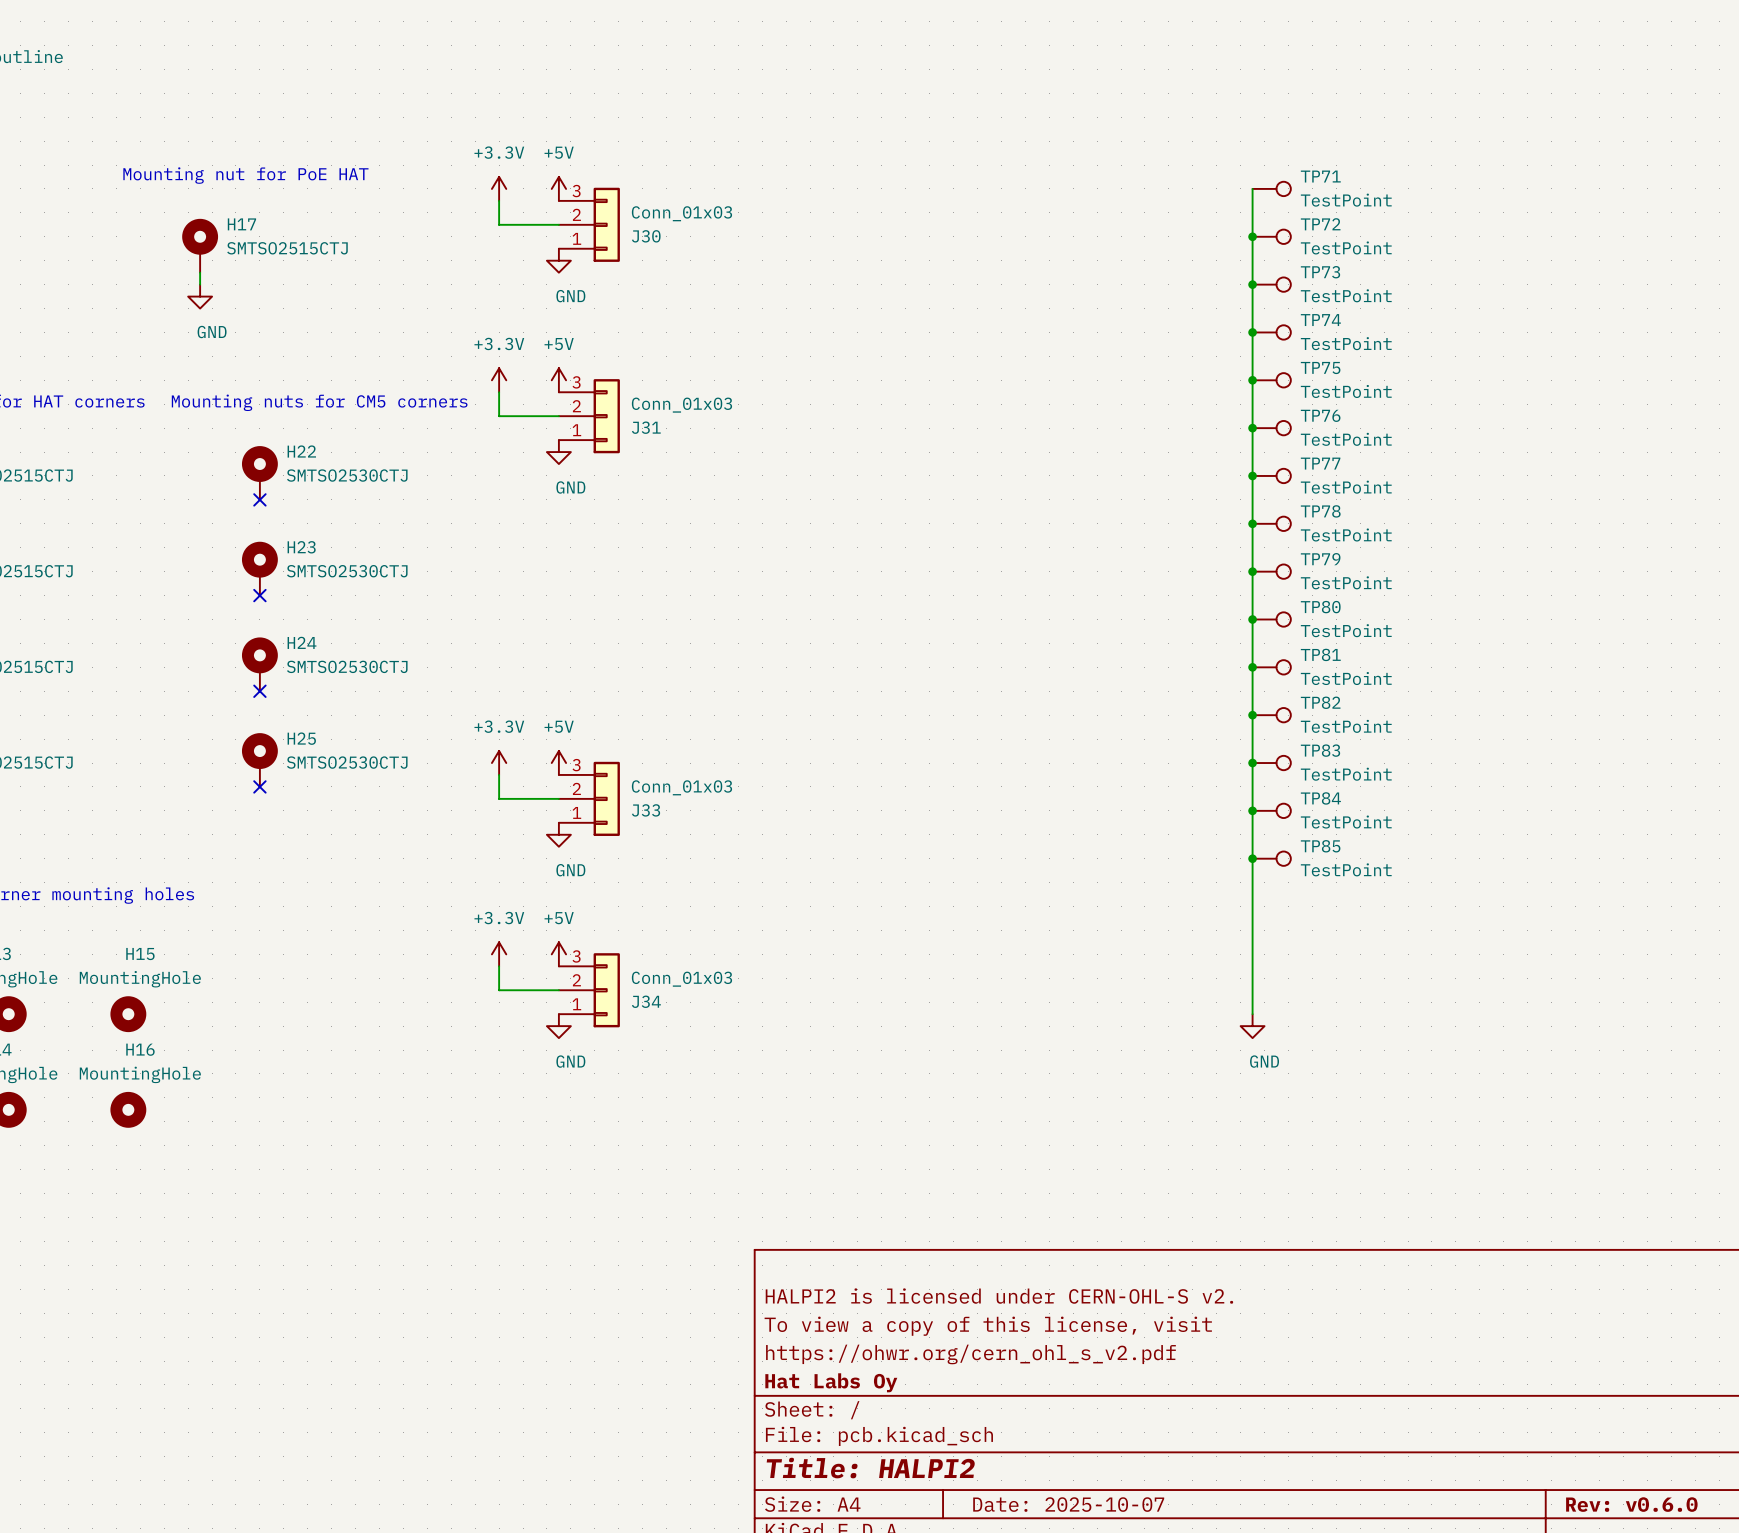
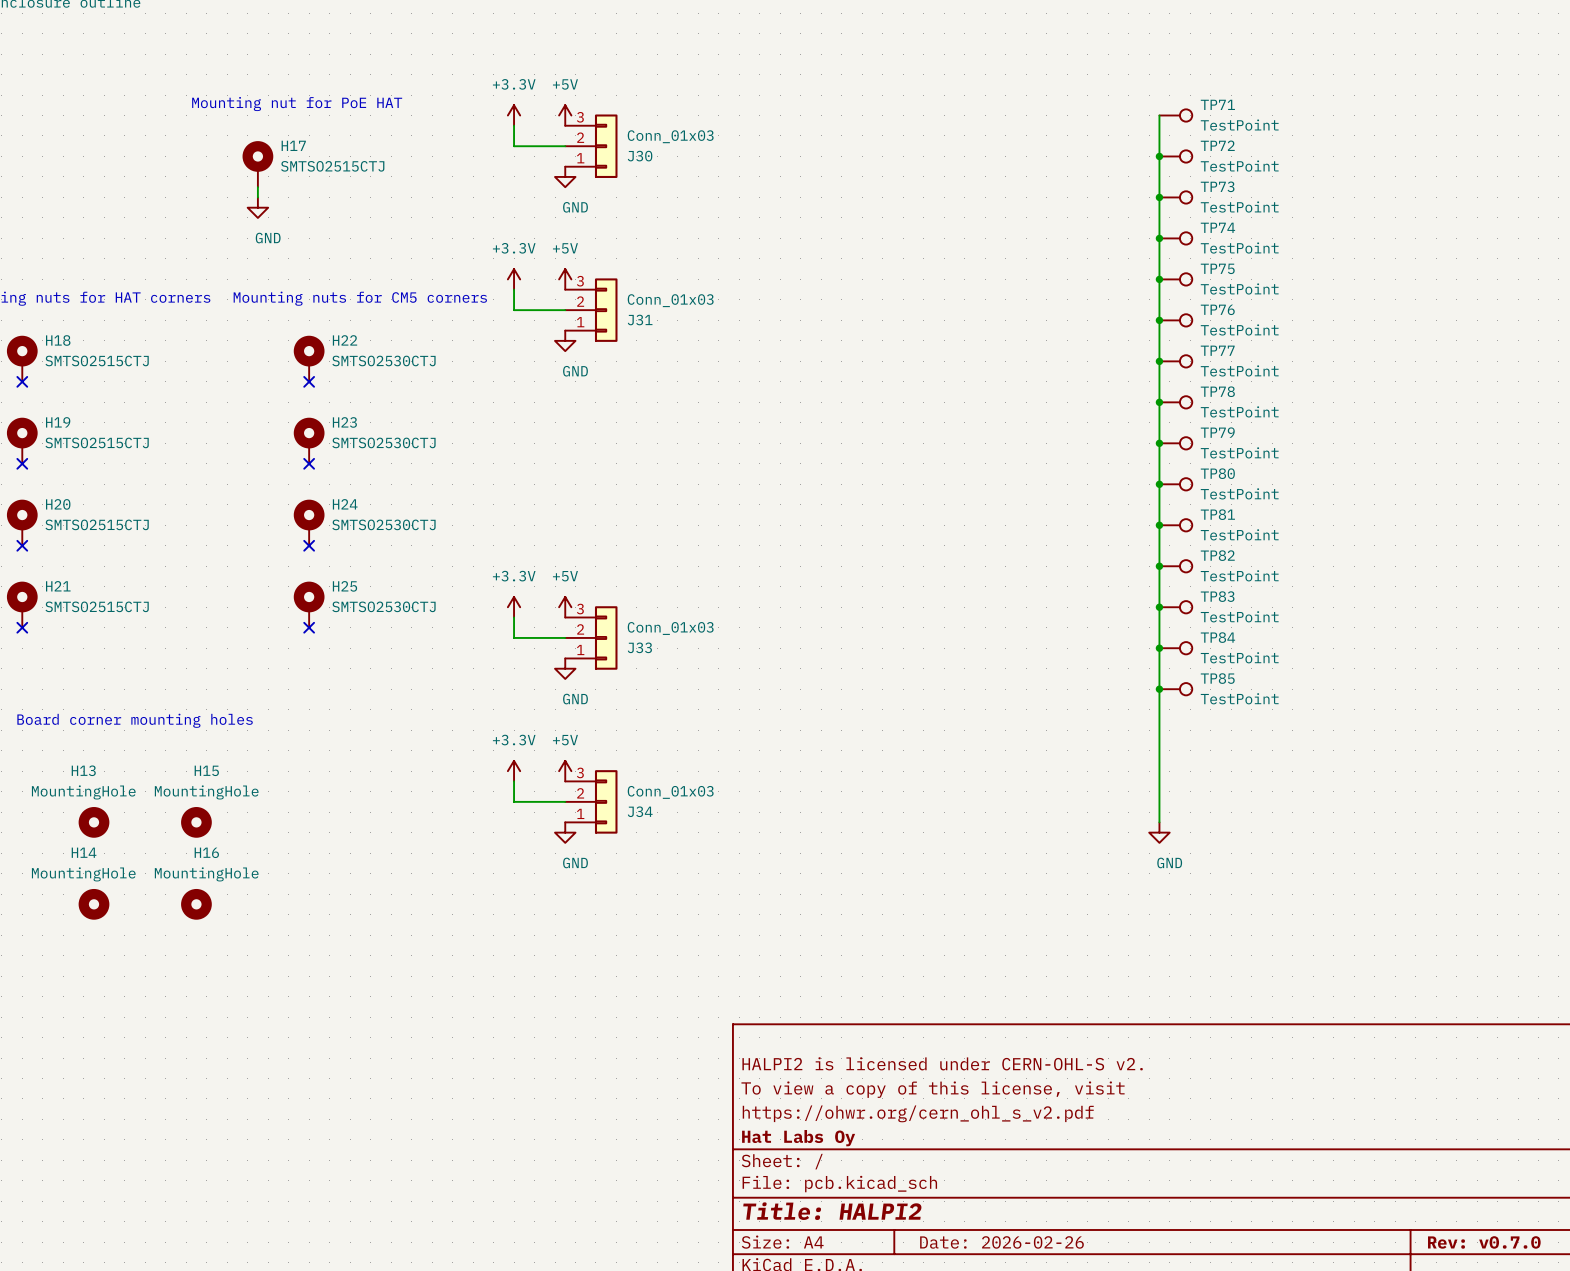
title block: Date: 2025-10-07 (1068, 1504) -> Date: 2026-02-26 (1001, 1242)
title block: Rev: v0.6.0 (1631, 1504) -> Rev: v0.7.0 (1484, 1242)

